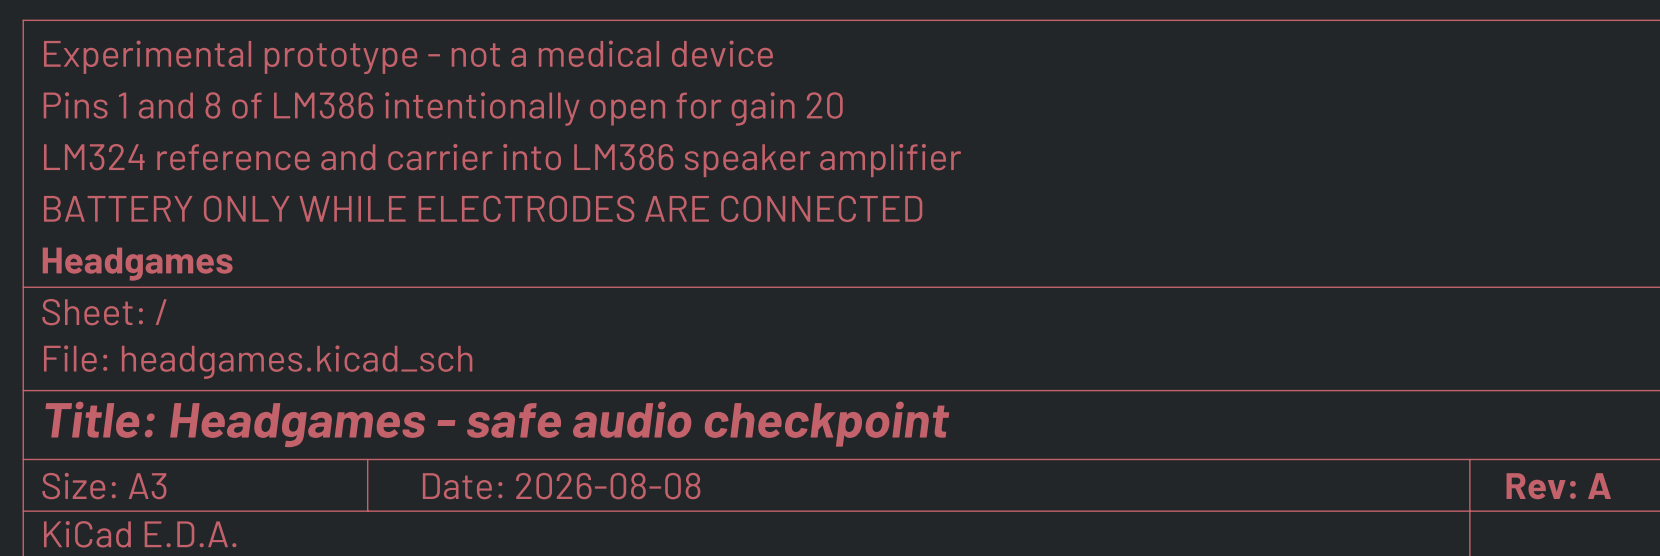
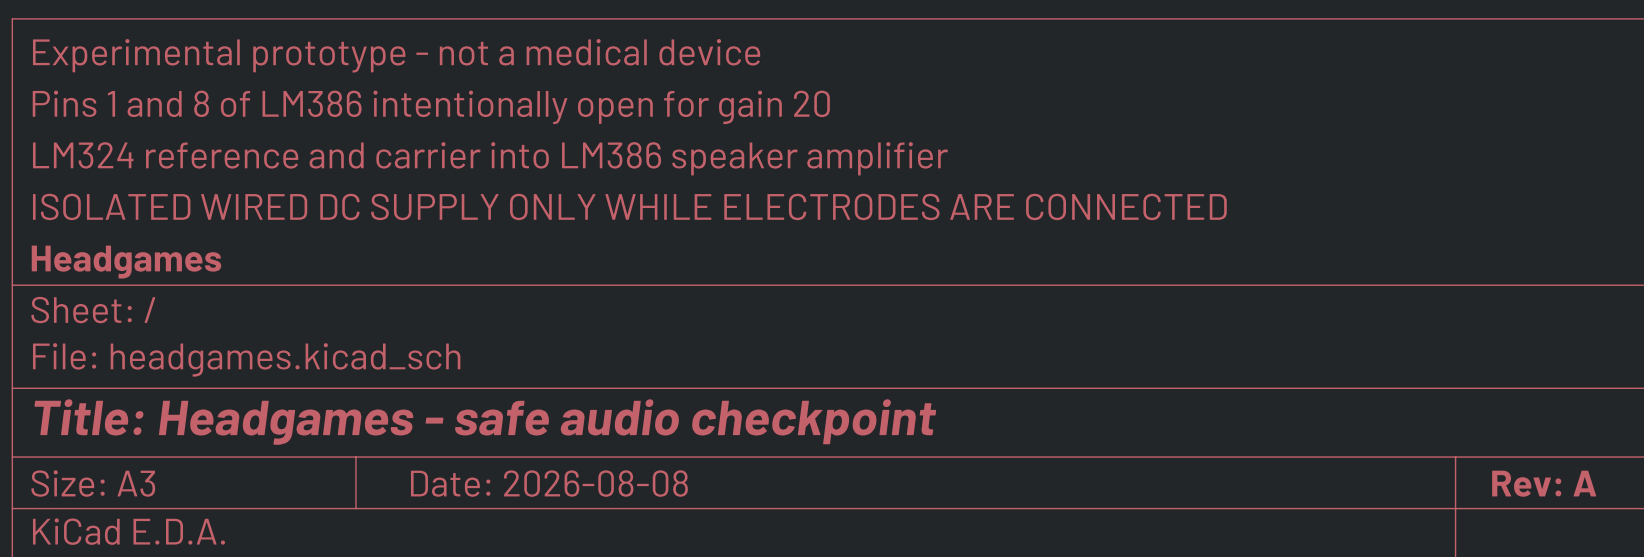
title block: BATTERY ONLY WHILE ELECTRODES ARE CONNECTED (483, 208) -> ISOLATED WIRED DC SUPPLY ONLY WHILE ELECTRODES ARE CONNECTED (629, 206)

